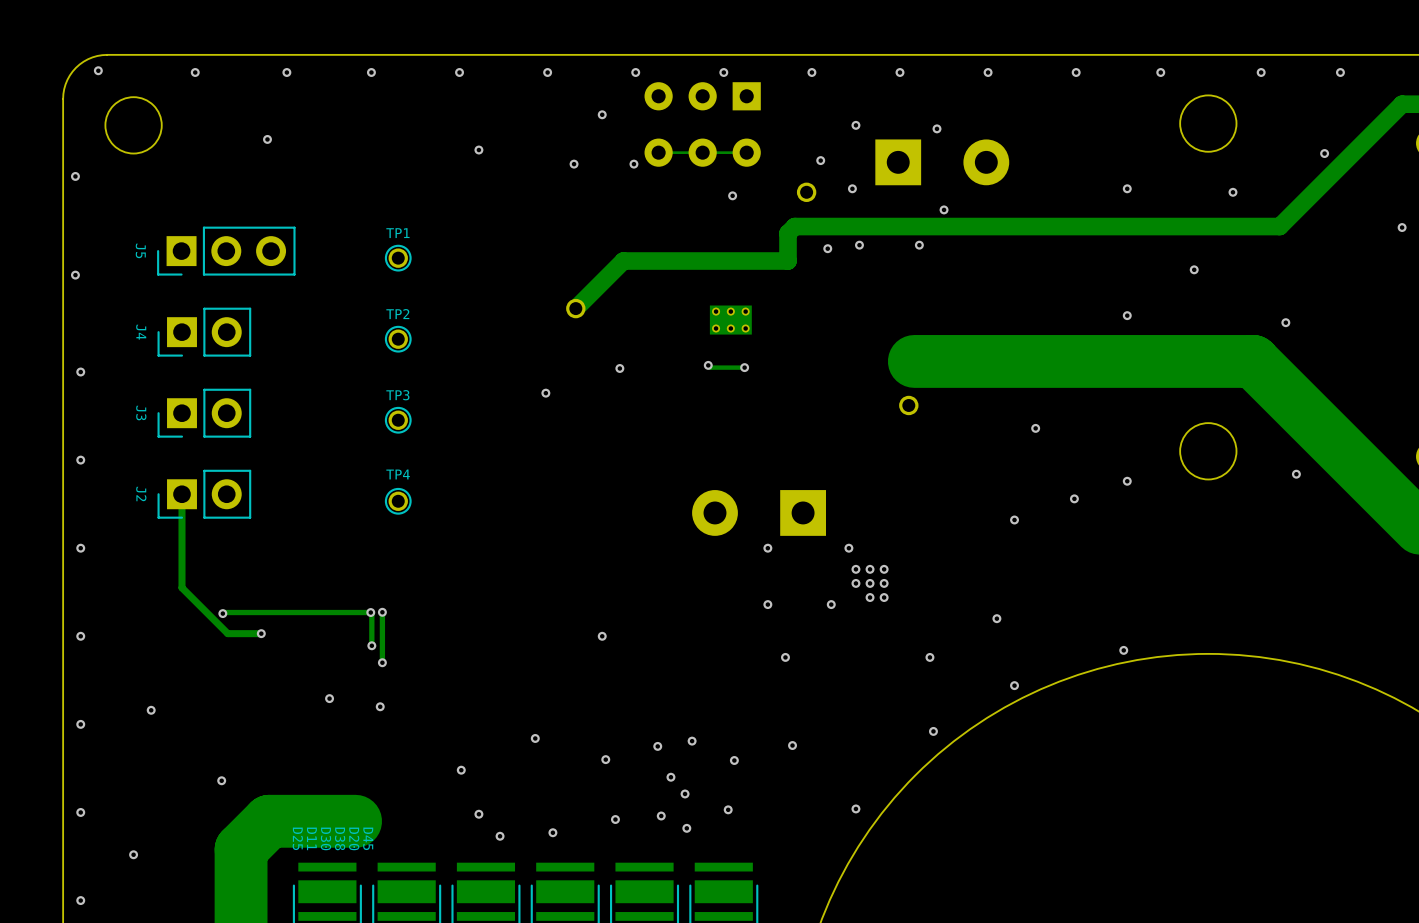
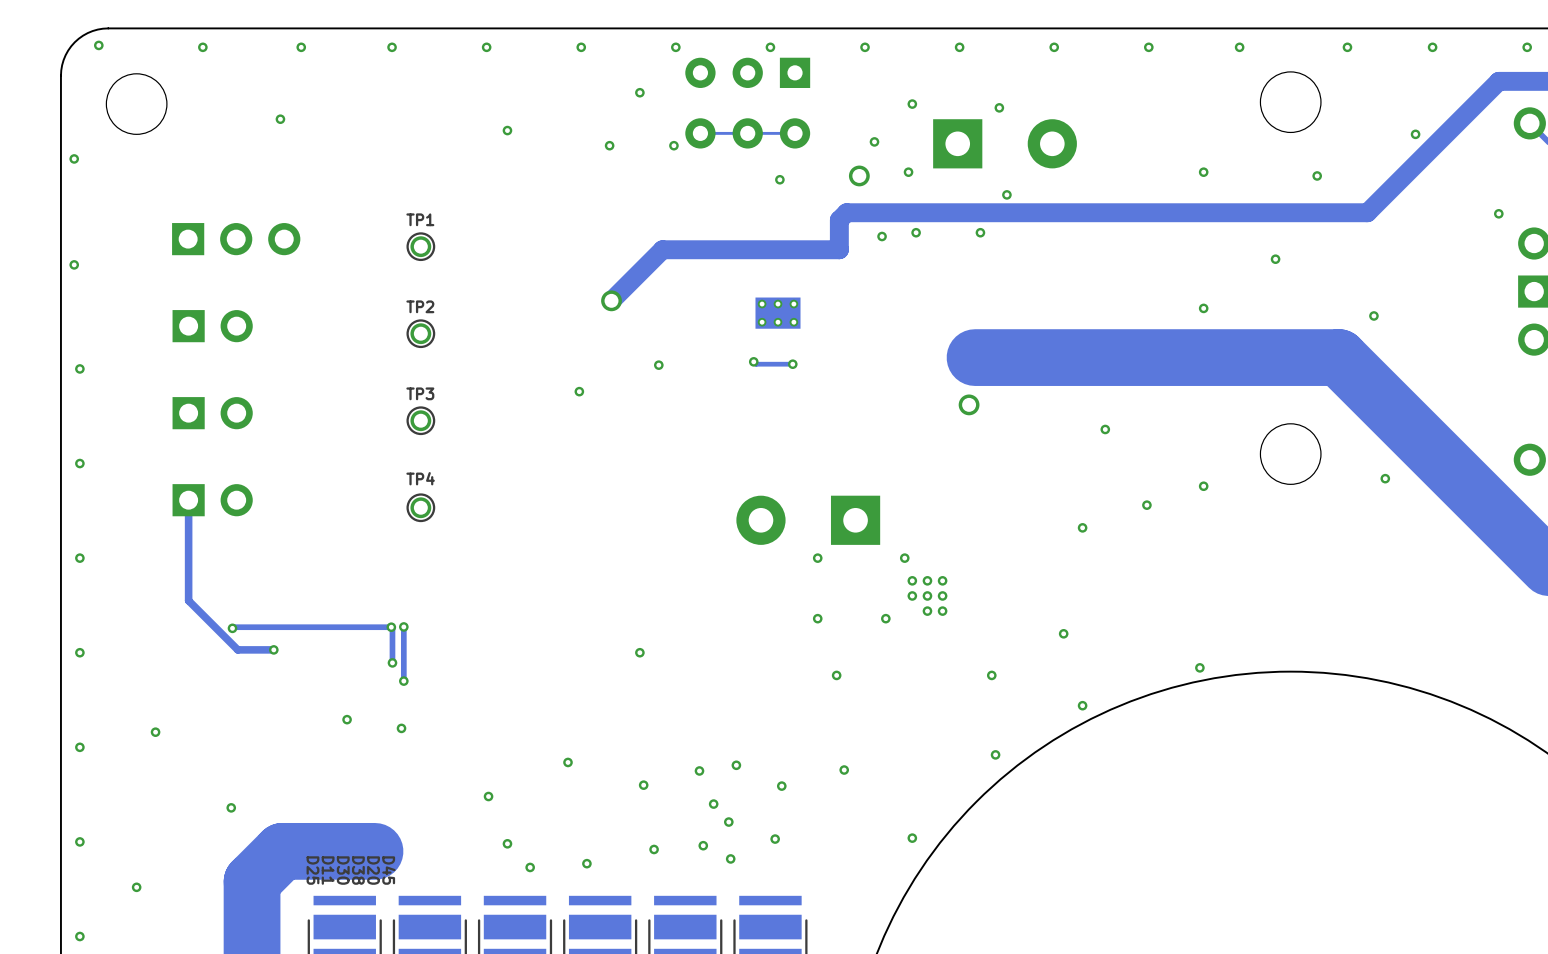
J5 side: bottom (226, 251) -> top (236, 239)
J4 side: bottom (204, 332) -> top (212, 326)
J3 side: bottom (204, 413) -> top (212, 413)
J2 side: bottom (204, 494) -> top (212, 500)

